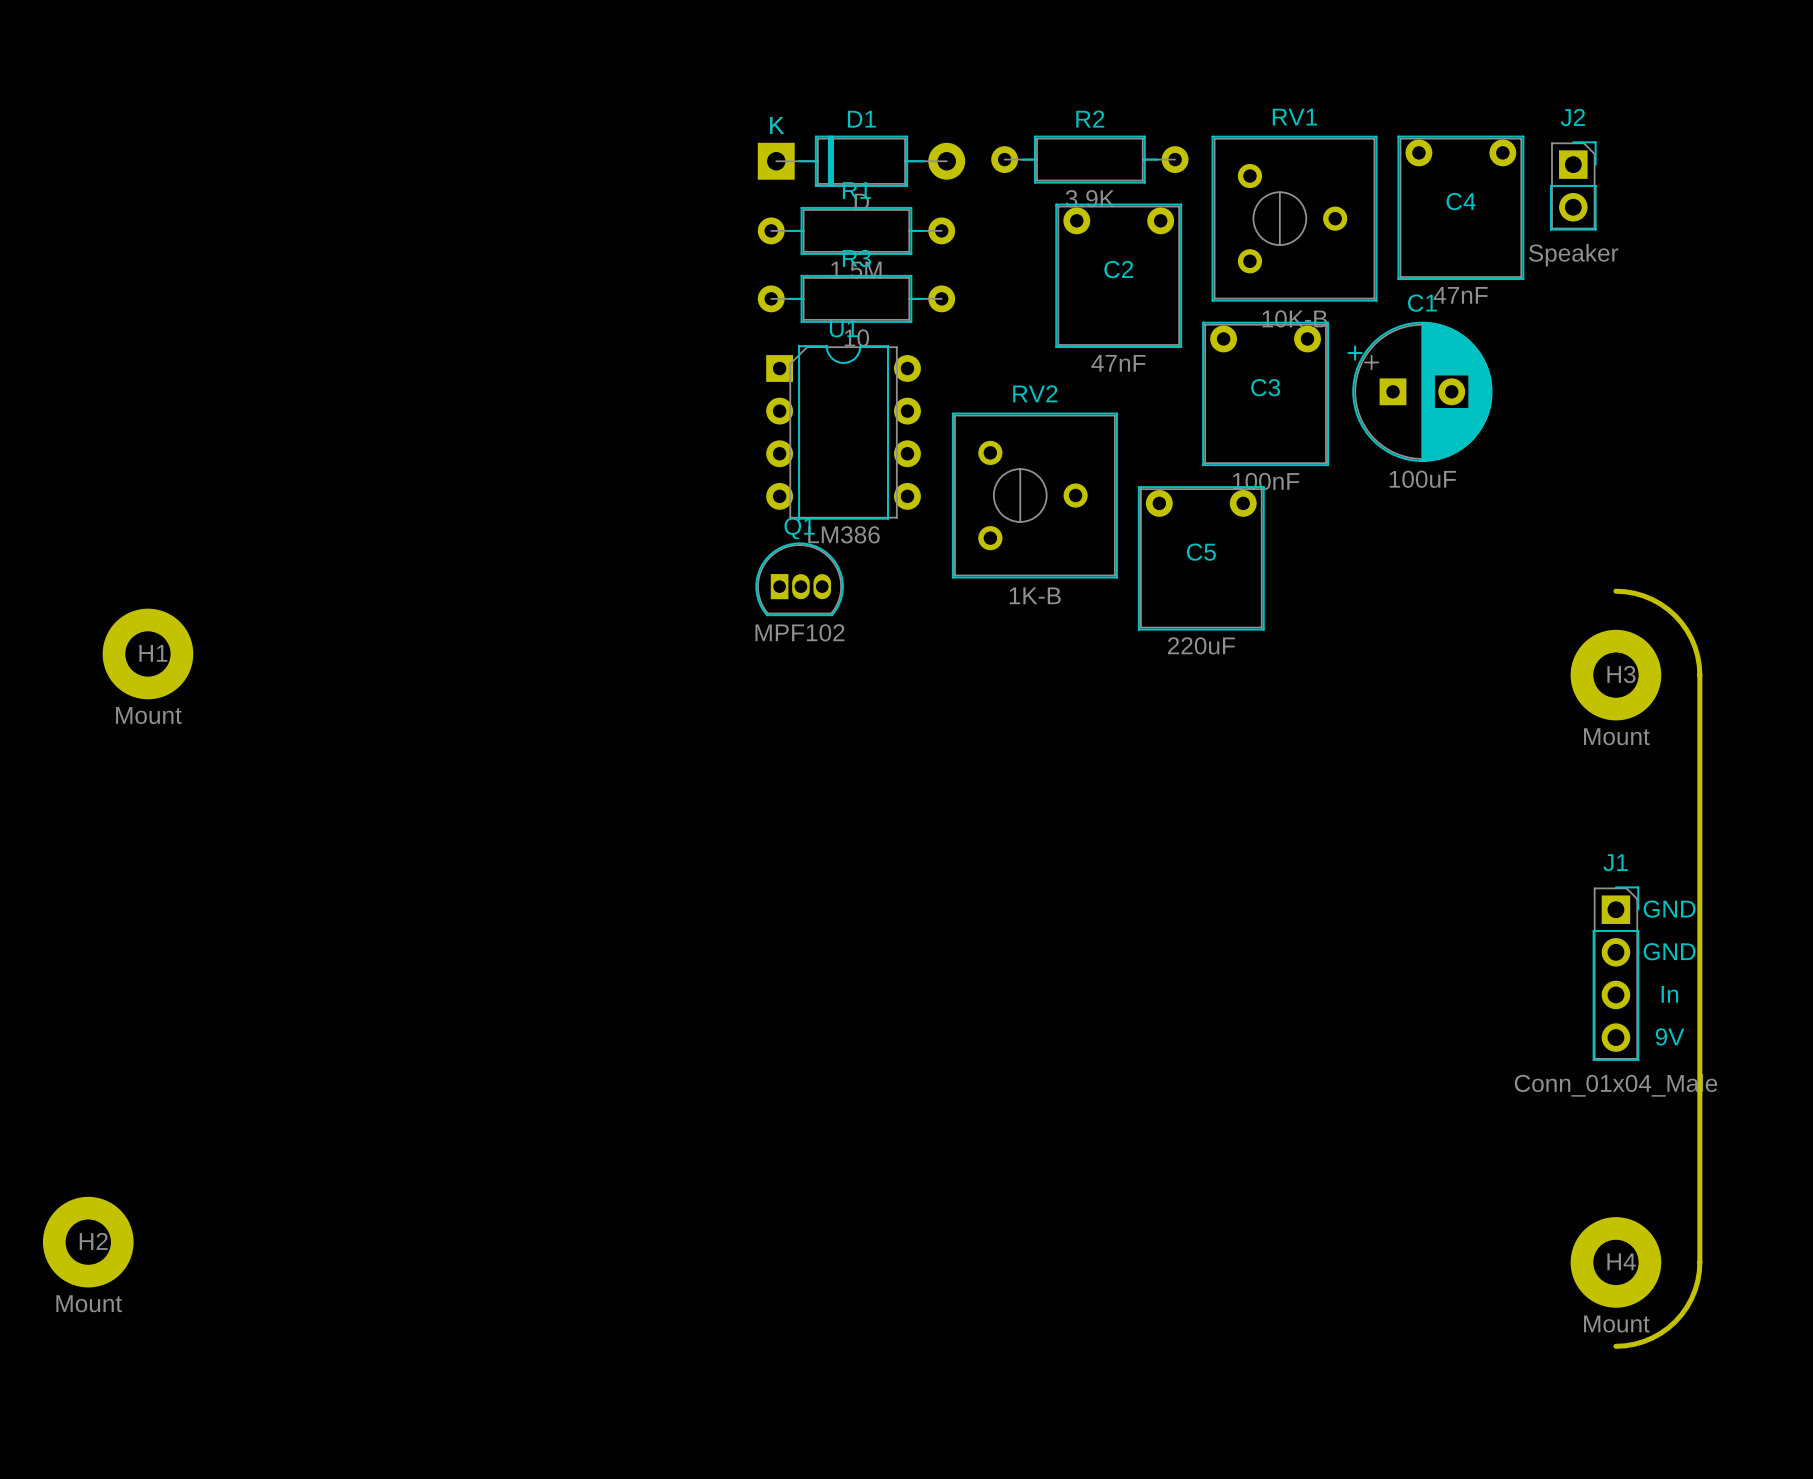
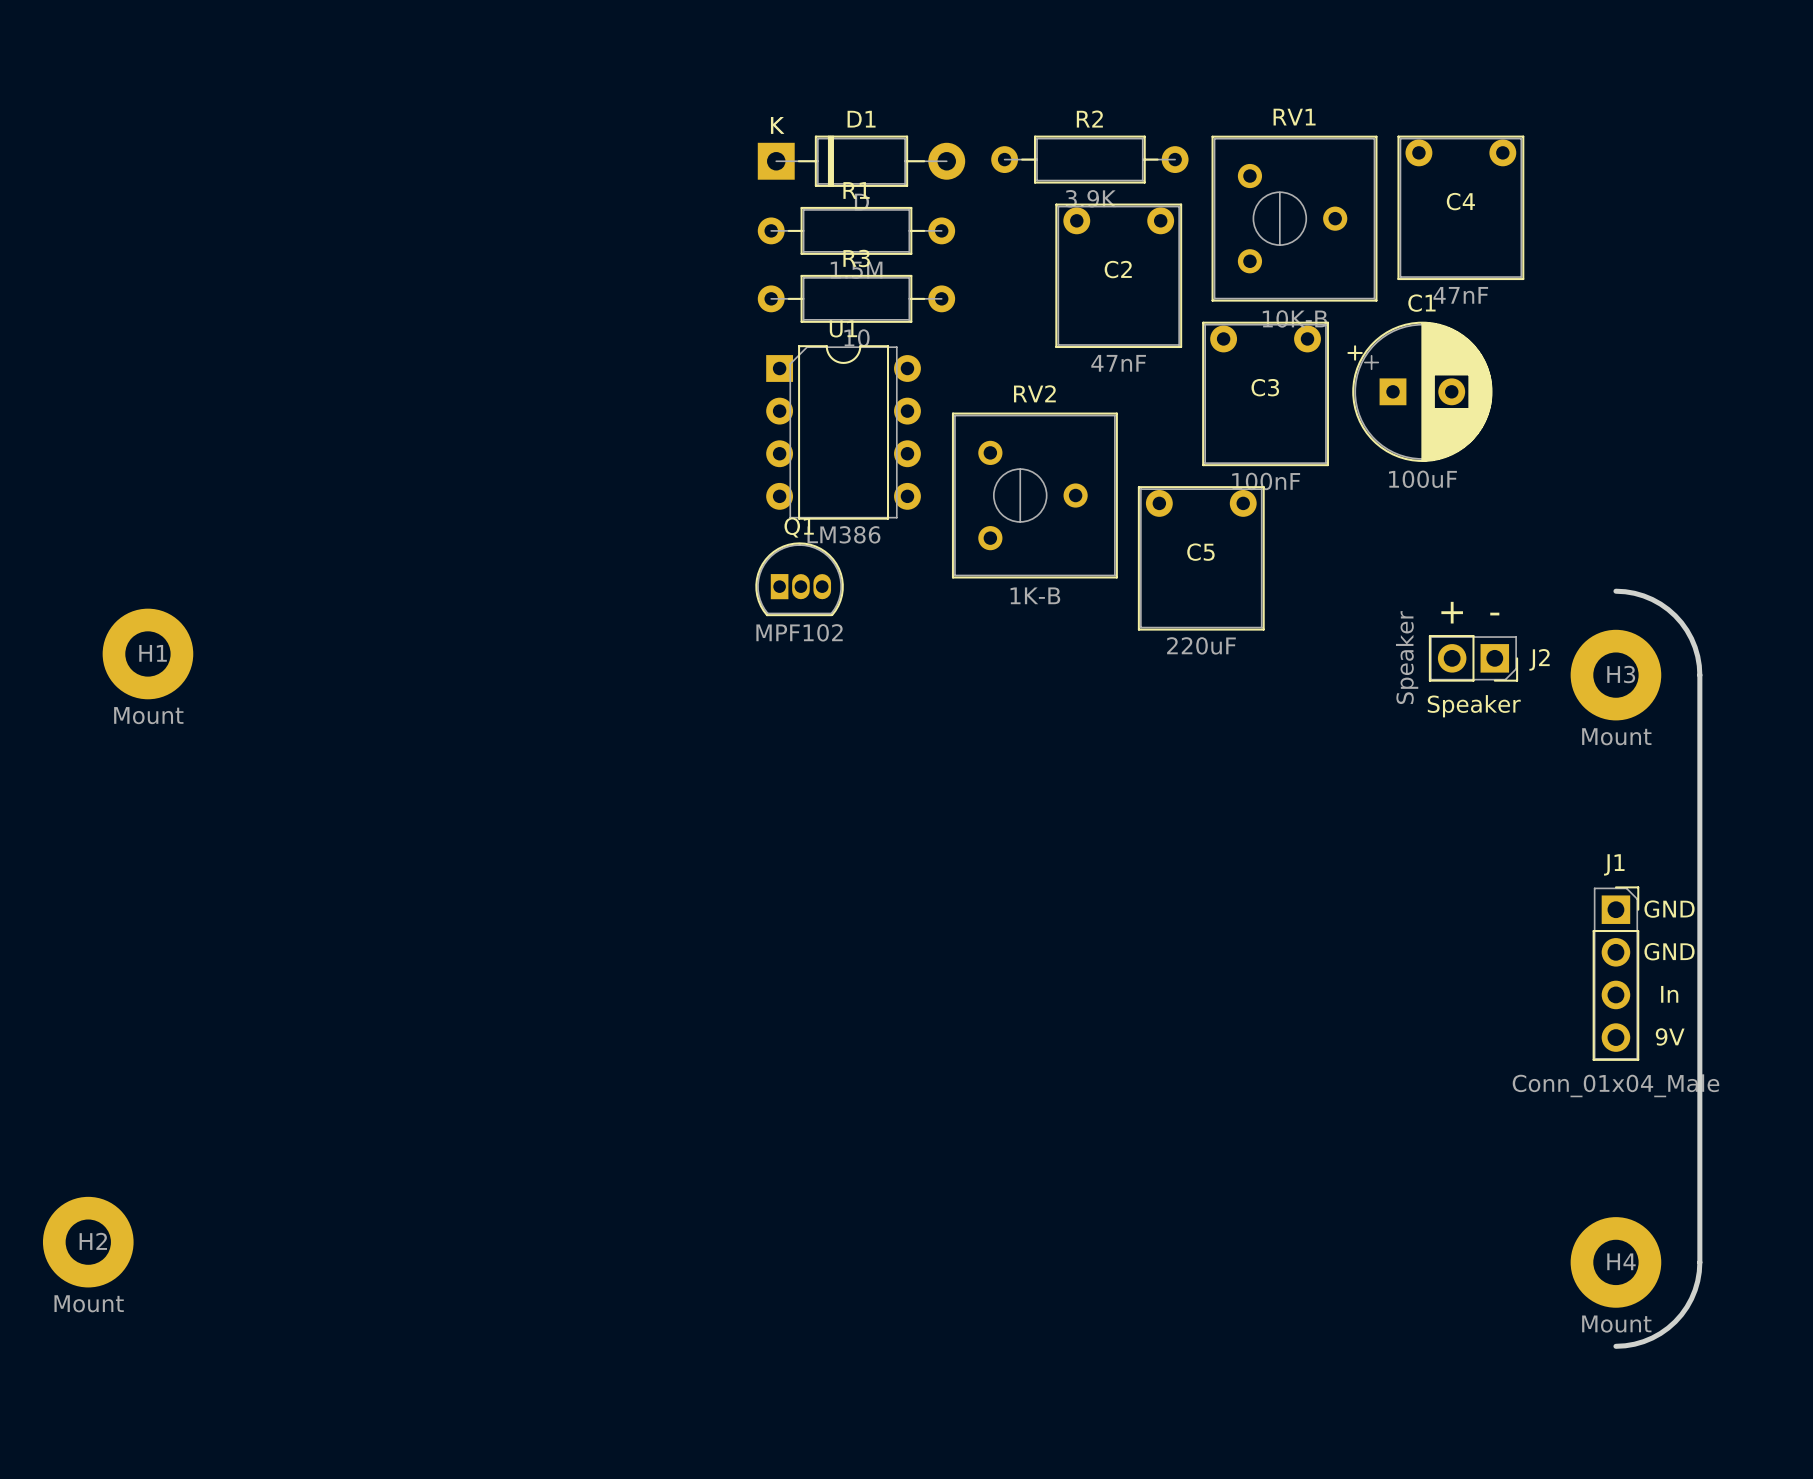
J2 rotation: 0° (1573, 185) -> 90° clockwise (1473, 658)
J2 position: (1573, 185) -> (1473, 658)
text: none -> + (1452, 612)
text: none -> - (1494, 614)
text: none -> Speaker (1474, 706)

